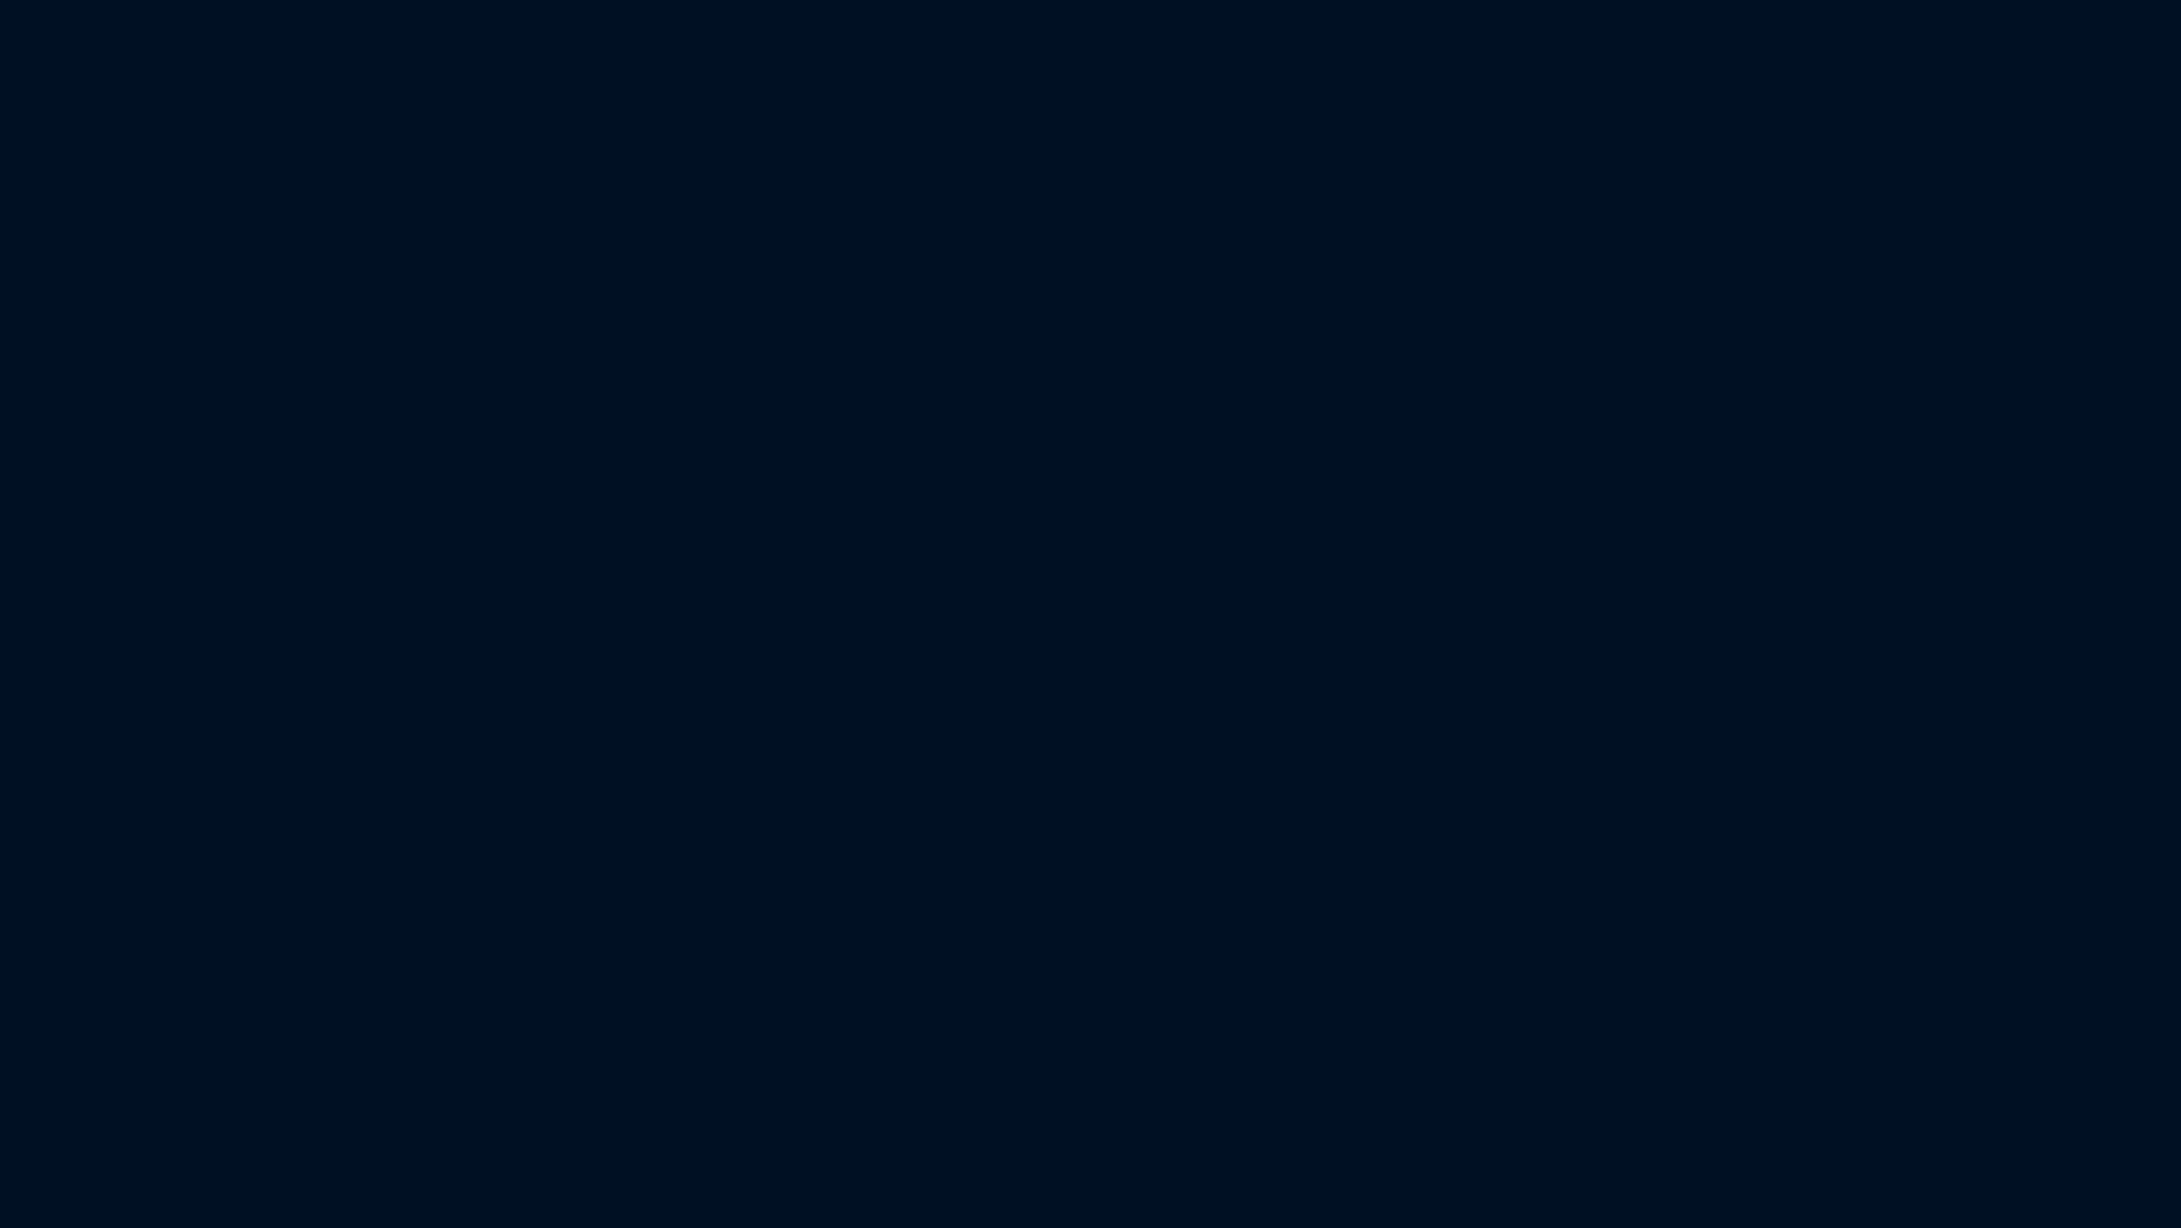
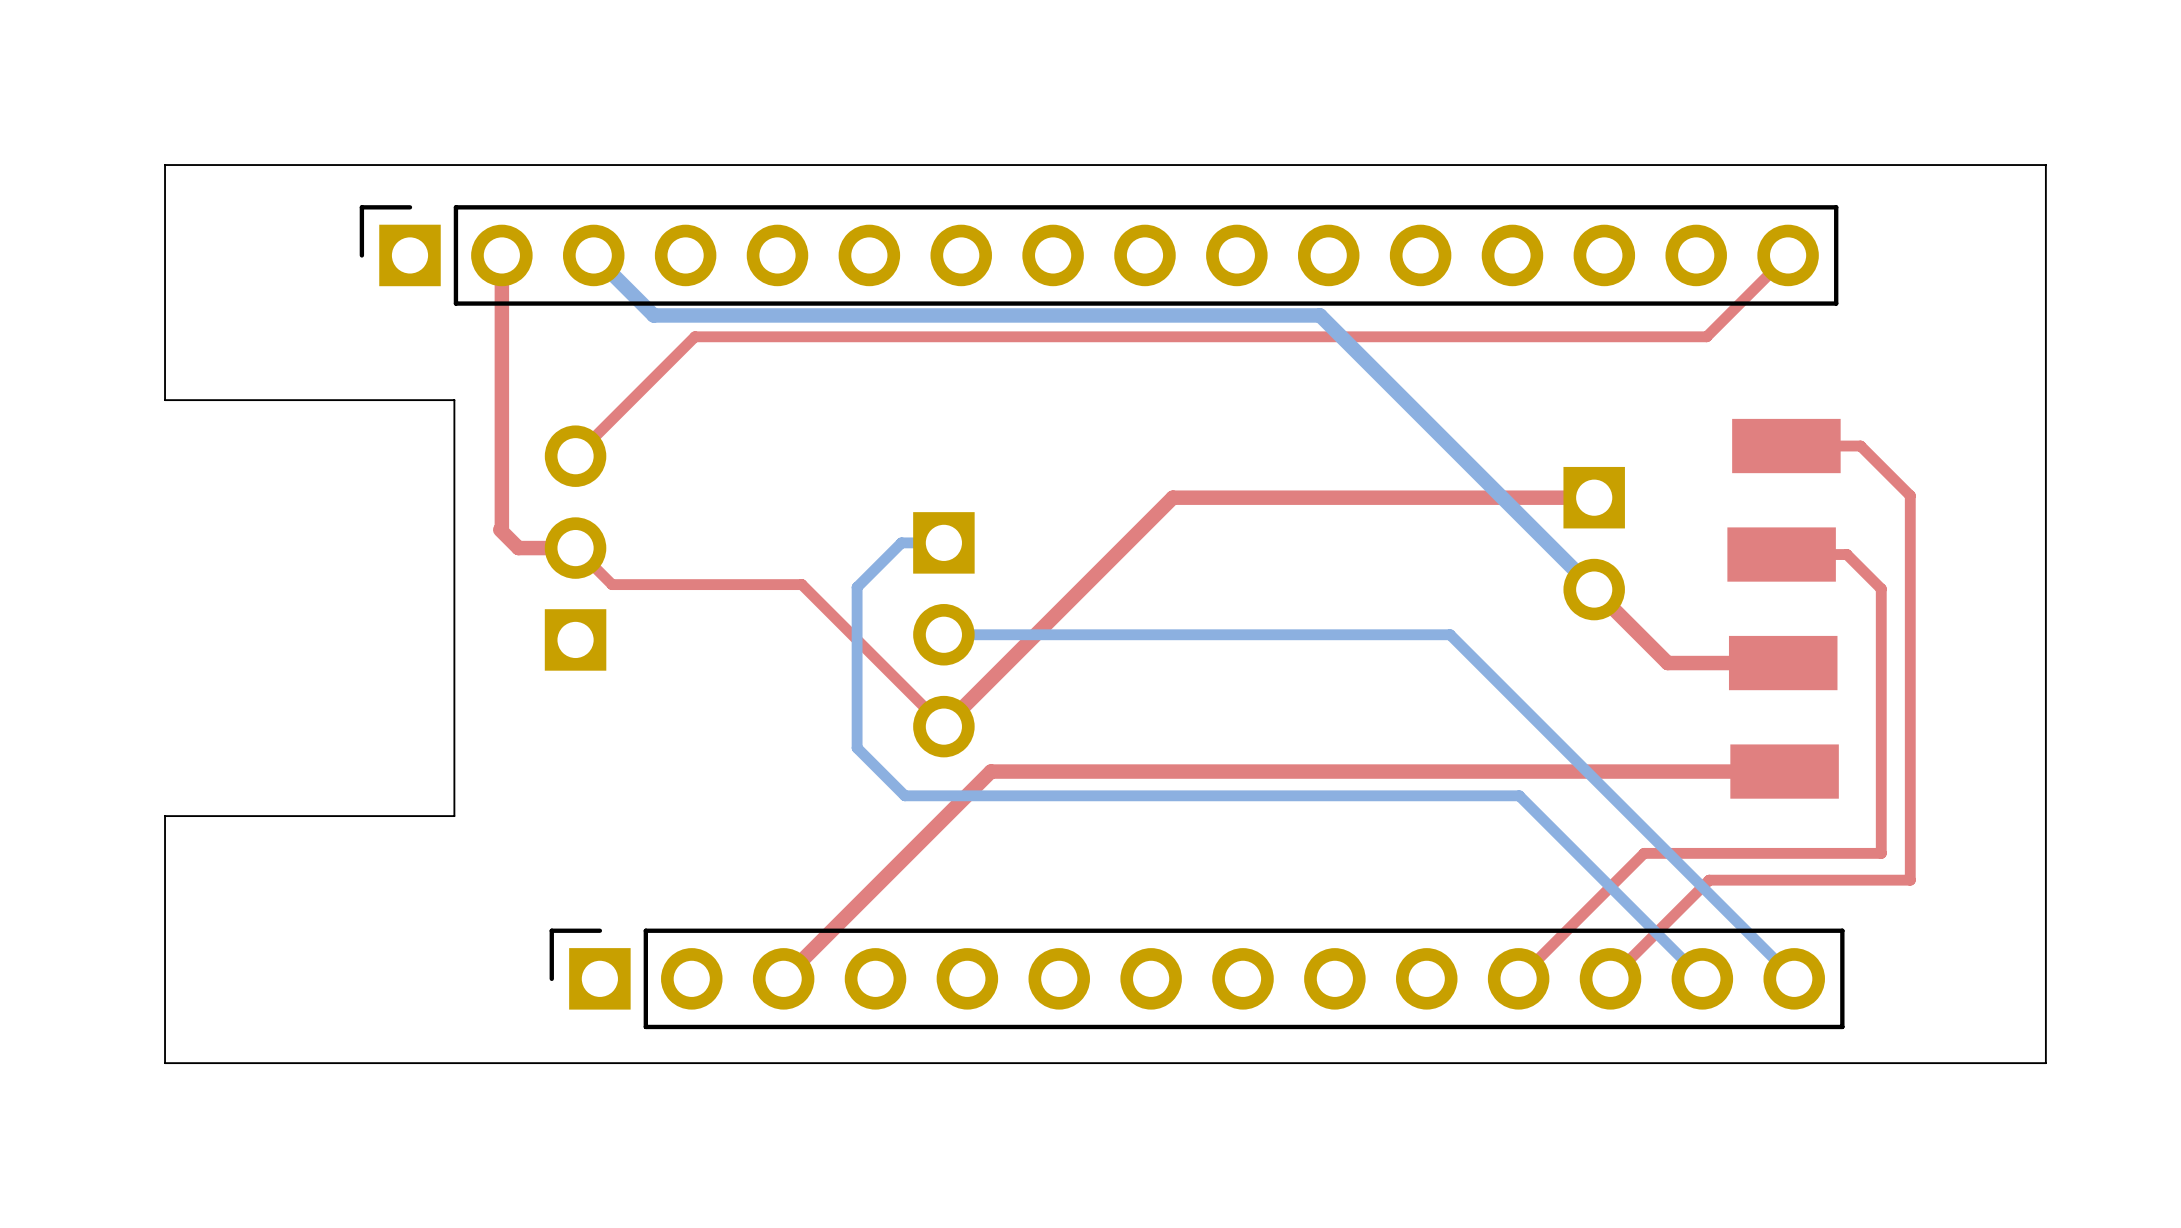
board edge: none -> (2045, 165) (165, 165) (165, 400) (454, 400) (454, 816) (165, 816) (165, 1063) (2045, 1063) (2045, 165)
top track: none -> (501, 255) (501, 528) (500, 529) (518, 548) (575, 548) (612, 584) (801, 584) (947, 730)
bottom track: none -> (593, 255) (653, 315) (1320, 315) (1594, 589)
part: none -> (1099, 255)
top track: none -> (1788, 255) (1706, 336) (694, 336) (575, 456)
top track: none -> (1786, 446) (1860, 446) (1910, 495) (1910, 880) (1709, 880) (1610, 978)
part: none -> (1786, 446)
top track: none -> (1599, 497) (1172, 497) (943, 726)
bottom track: none -> (943, 542) (901, 542) (857, 587) (857, 748) (904, 795) (1519, 795) (1702, 978)
part: none -> (1594, 543)
part: none -> (575, 548)
top track: none -> (1781, 554) (1846, 554) (1881, 588) (1881, 853) (1644, 853) (1518, 978)
part: none -> (1781, 554)
top track: none -> (1594, 589) (1667, 663) (1783, 663)
bottom track: none -> (943, 634) (1450, 634) (1794, 978)
part: none -> (943, 634)
part: none -> (1783, 663)
top track: none -> (1784, 771) (990, 771) (783, 978)
part: none -> (1784, 771)
part: none -> (1197, 978)

